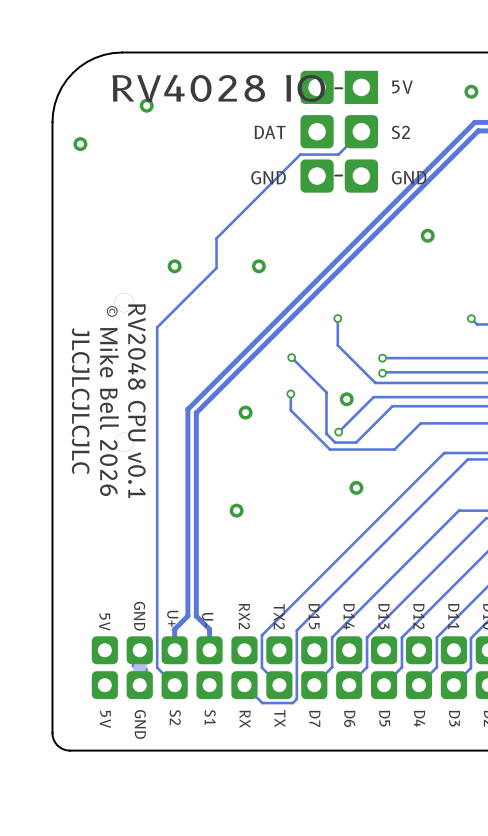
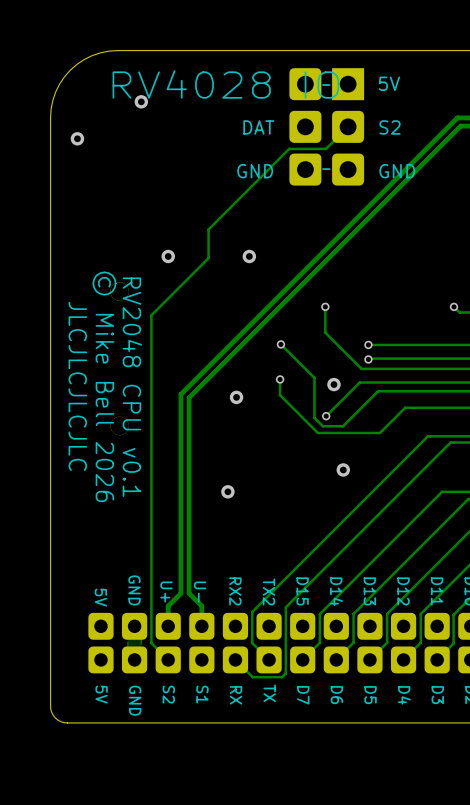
via: (471, 91) -> none
via: (427, 235) -> none

